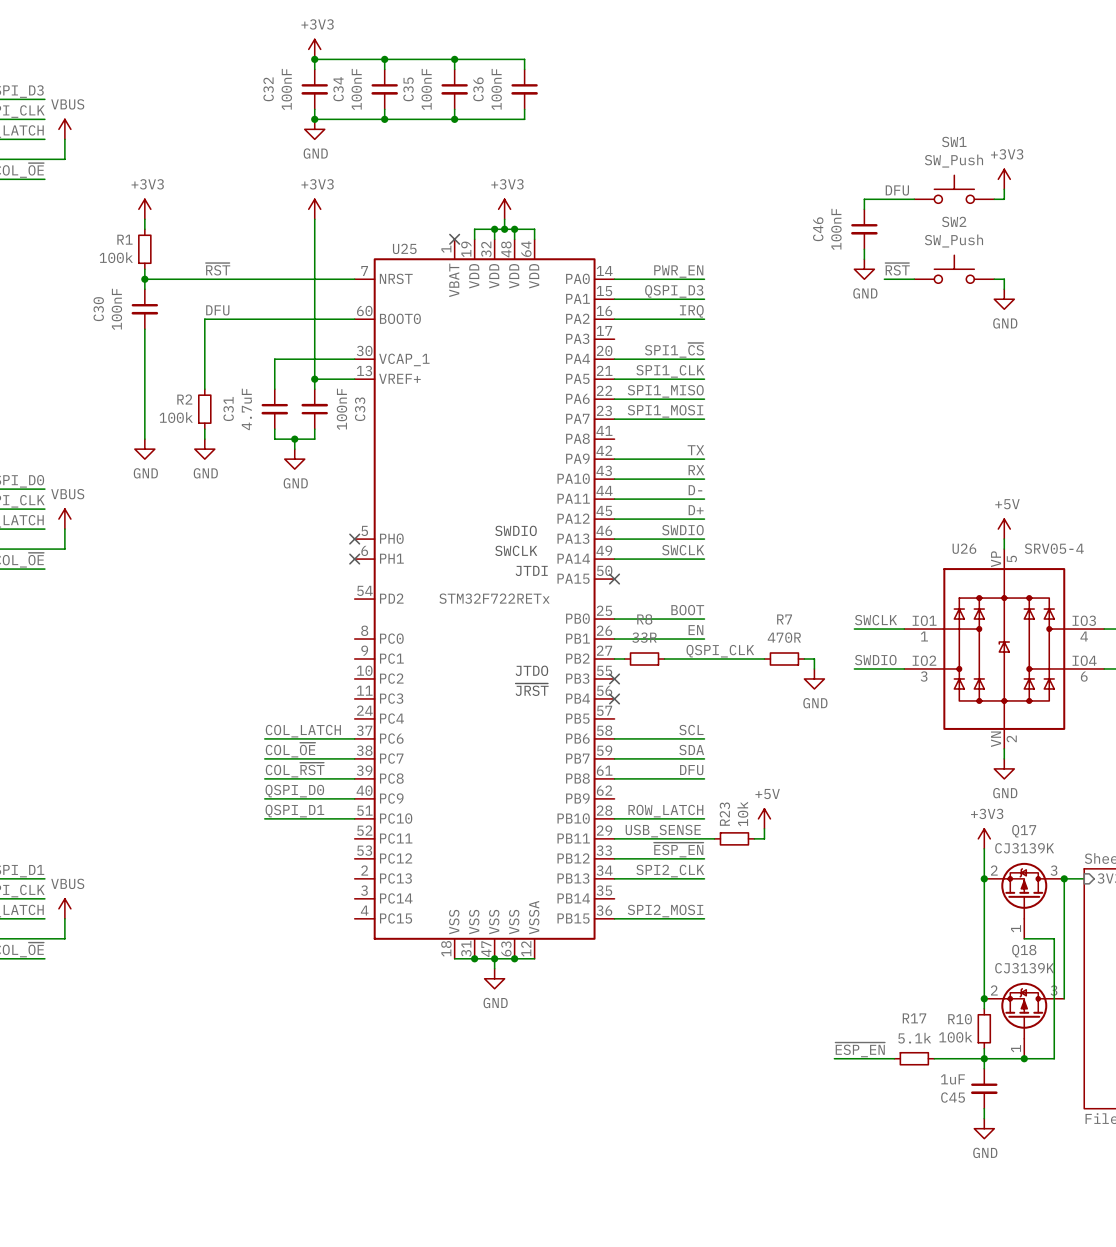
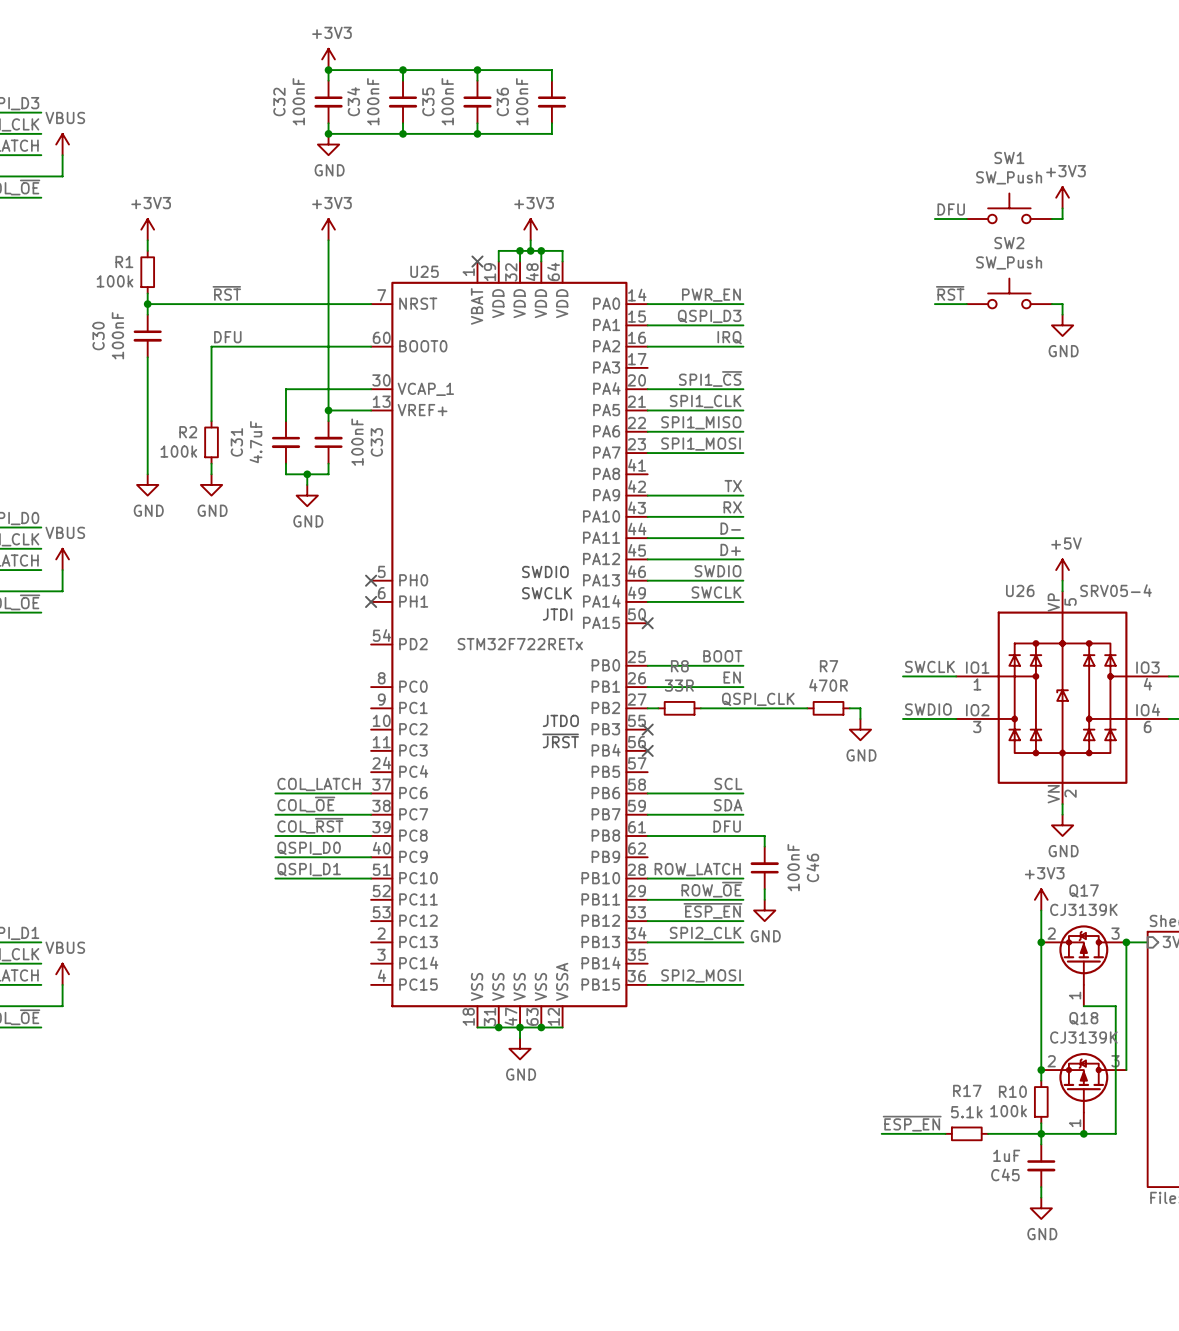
wire: (884, 199) (864, 199) (864, 209) -> none
C46 rotation: 0° (864, 229) -> 180° (764, 867)
C46 position: (864, 229) -> (764, 867)
wire: (864, 249) (864, 259) -> none
power symbol: GND (864, 269) -> none
wire: none -> (743, 836) (764, 836) (764, 846)
power symbol: +5V (764, 818) -> none
wire: none -> (764, 889) (764, 899)
wire: (764, 828) (764, 838) (754, 838) -> none
label: none -> ROW_~{OE} (711, 889)
label: USB_SENSE (663, 831) -> none
wire: (704, 838) (714, 838) -> none
R23: 10k (734, 838) -> none
power symbol: none -> GND (764, 910)

